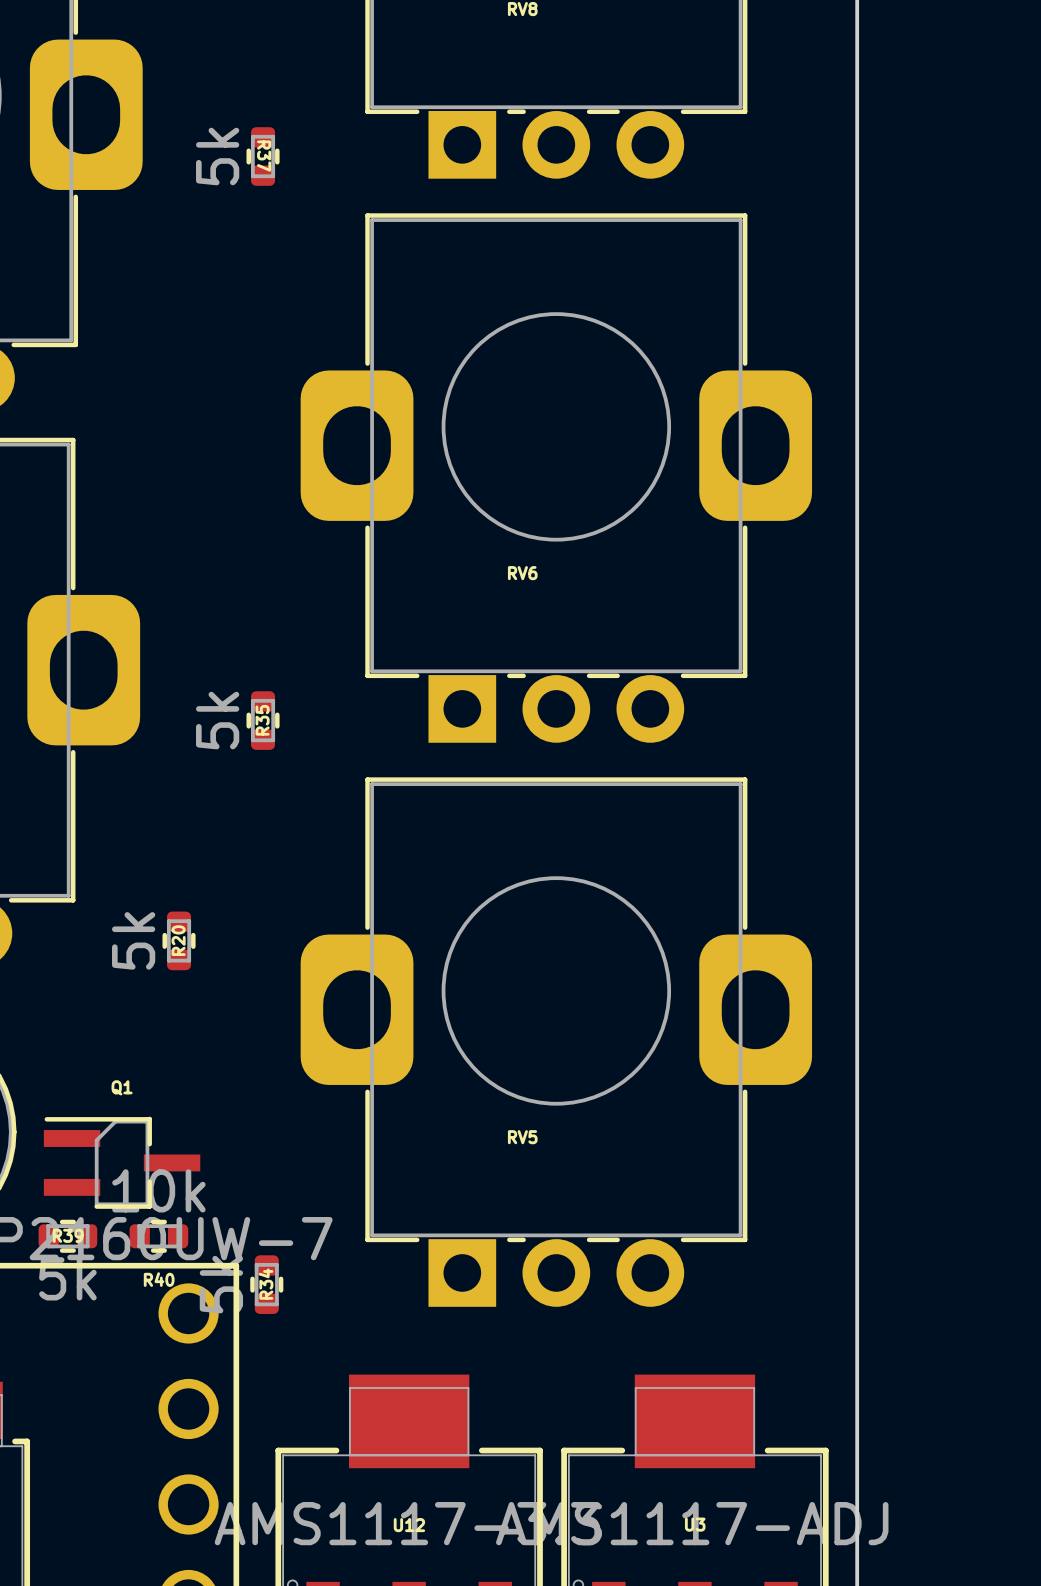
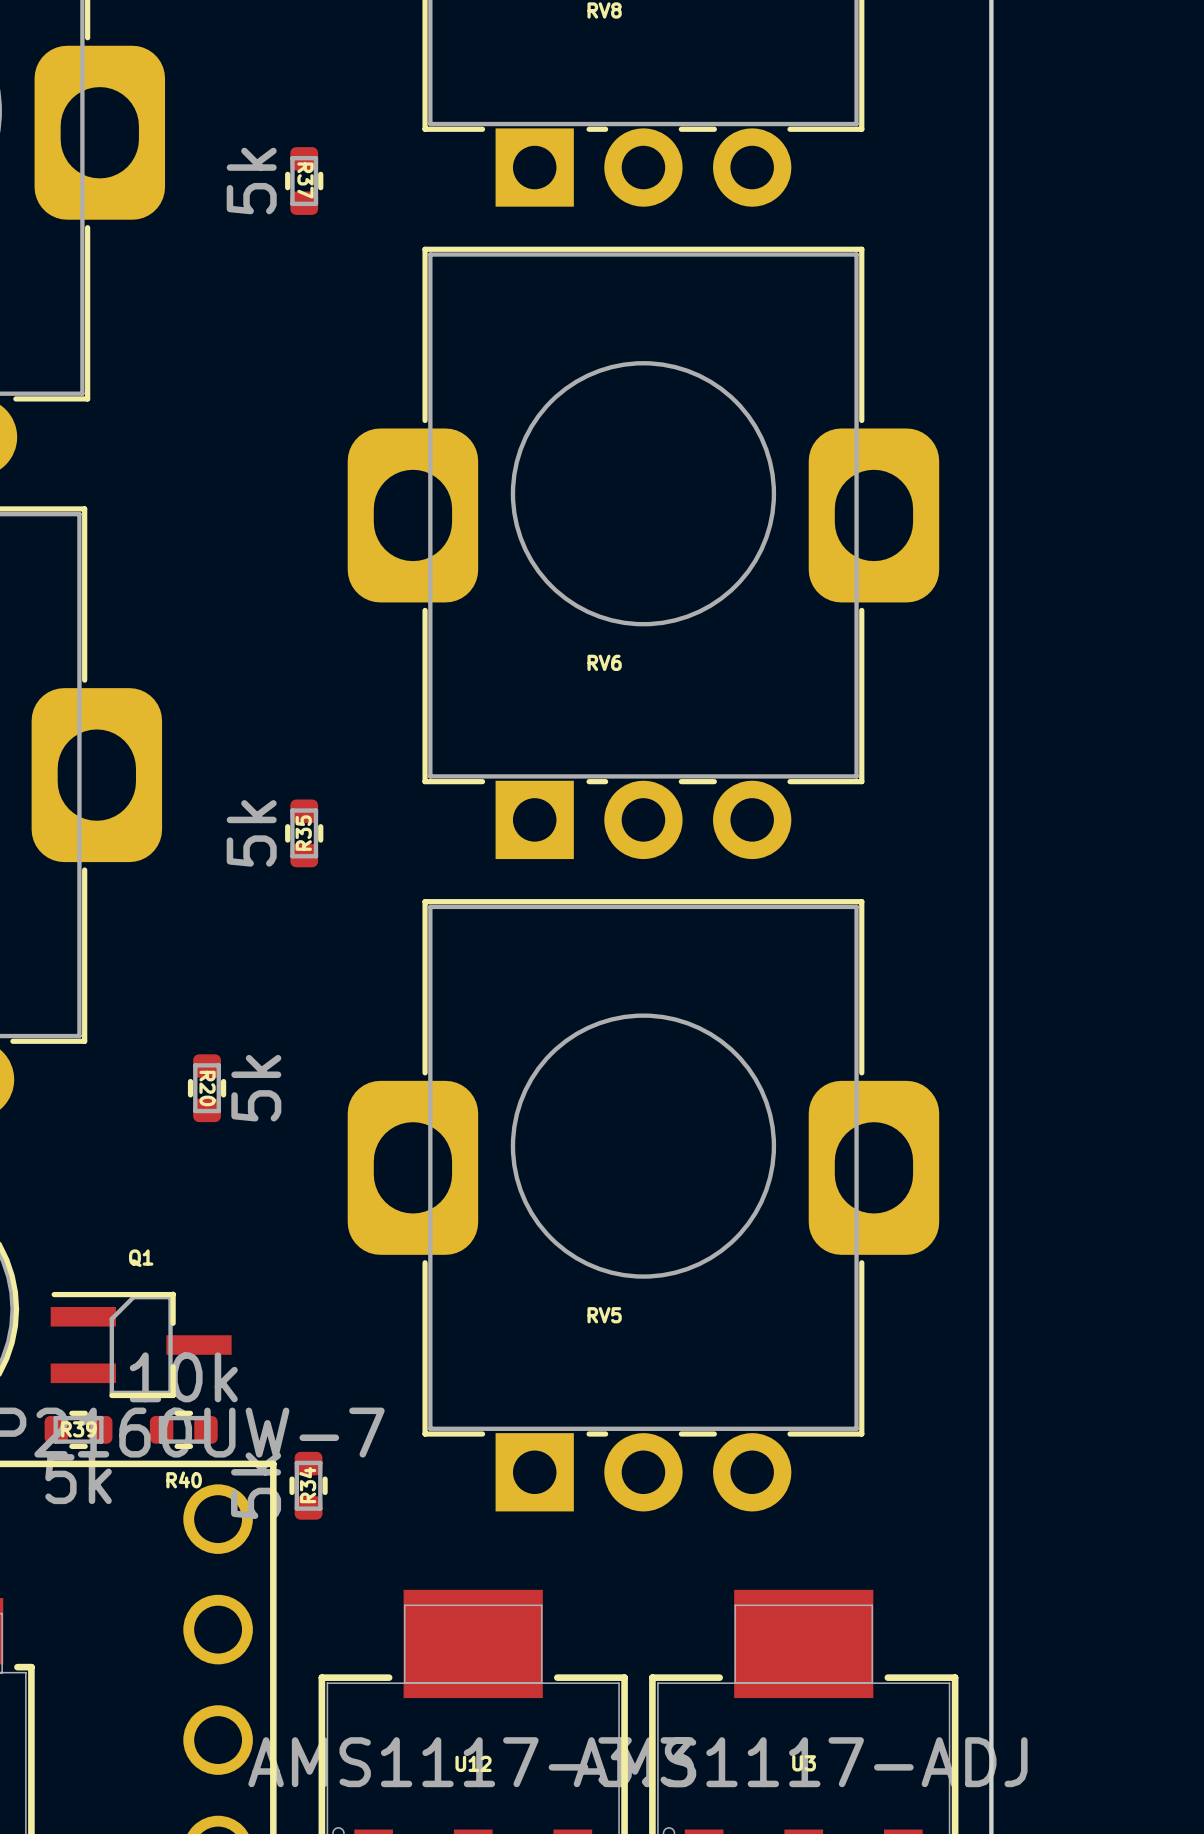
R20 value position: 5k (133, 940) -> 5k (256, 1088)
R20 name rotation: 0° (178, 940) -> 180° (207, 1088)

